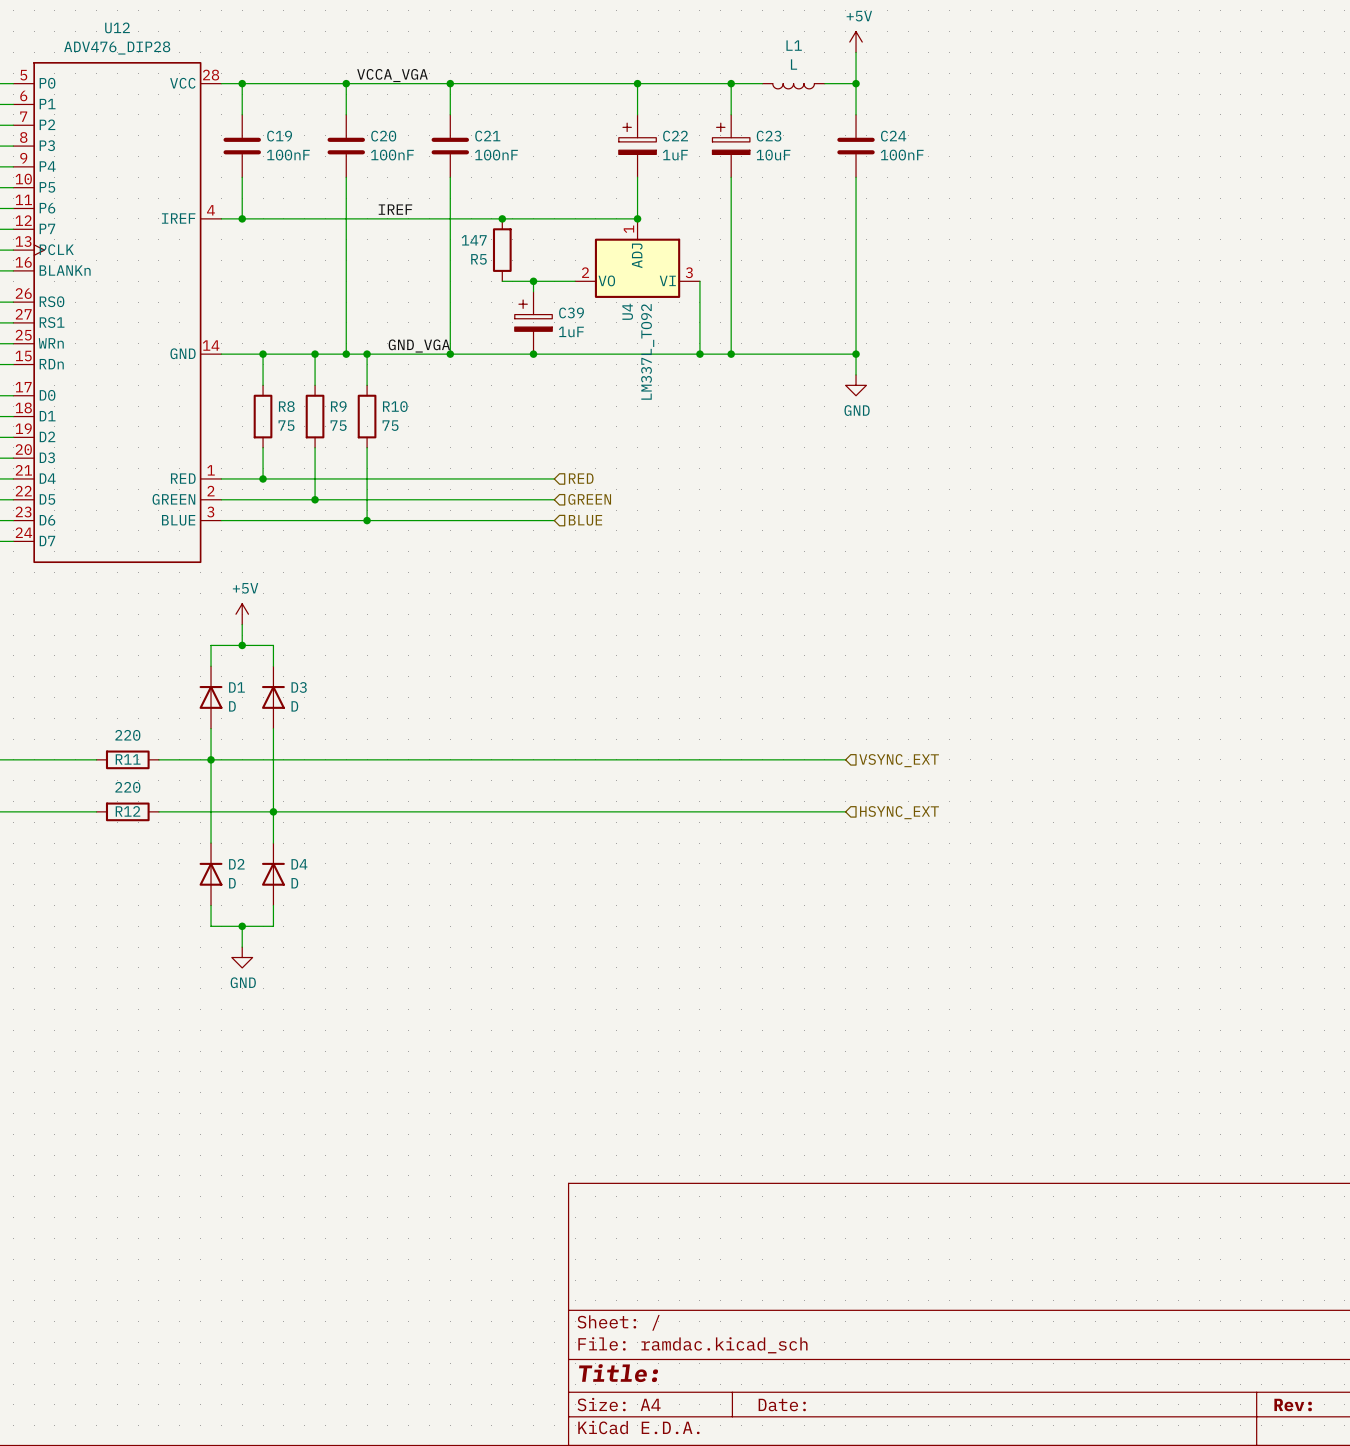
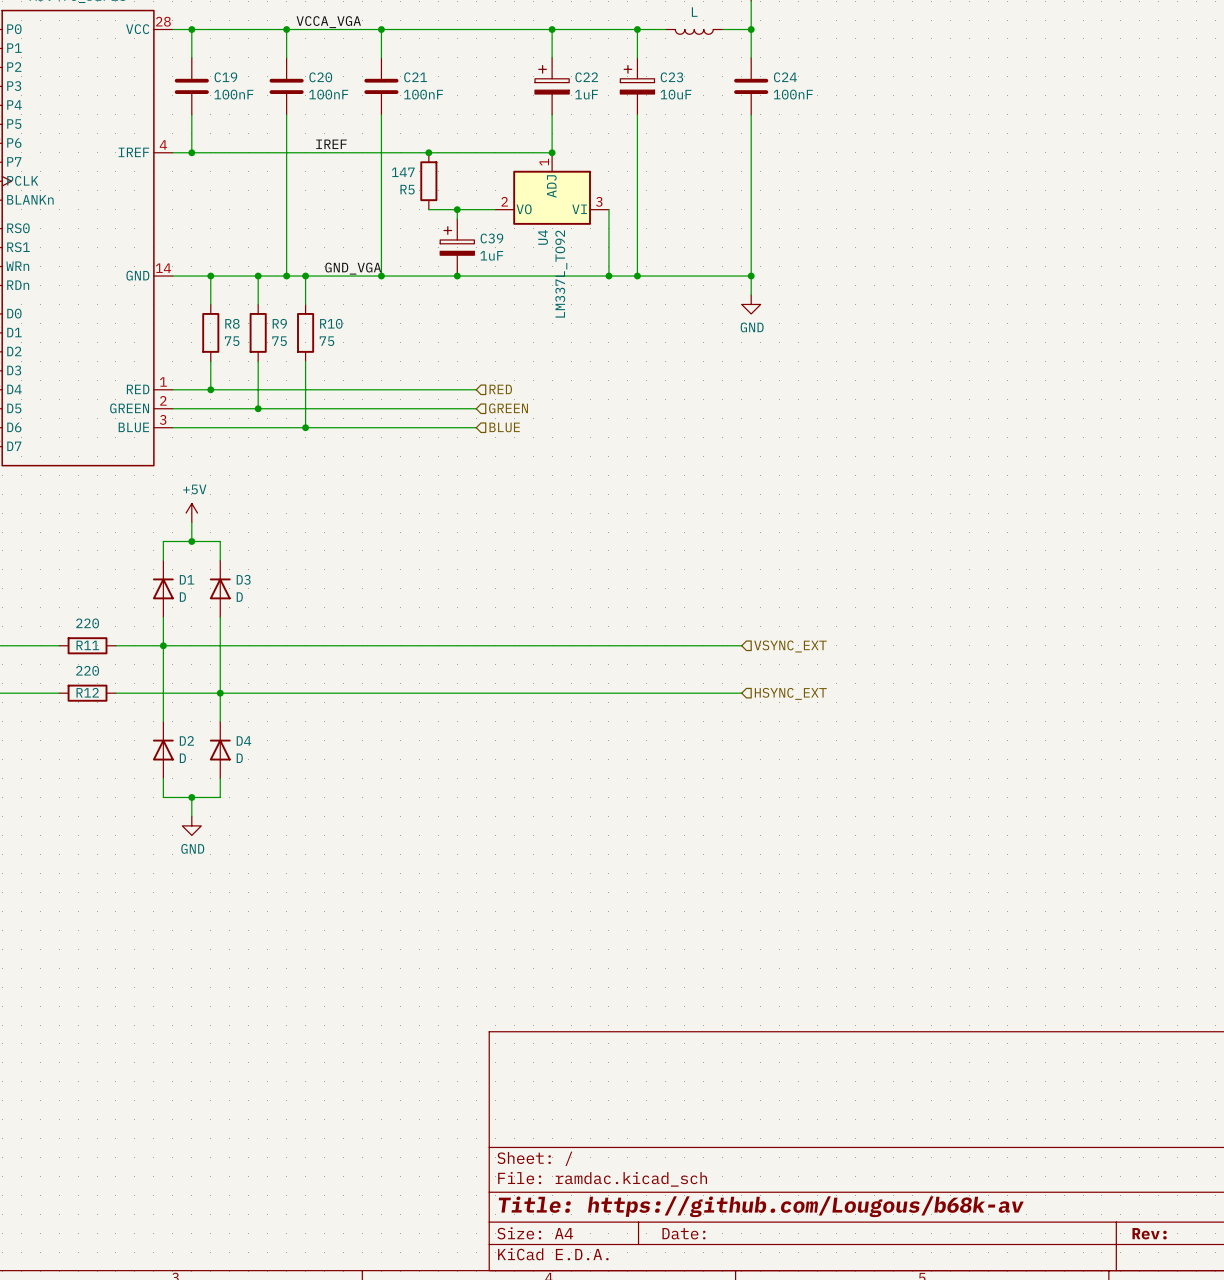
title block: Title: (618, 1373) -> Title: https://github.com/Lougous/b68k-av (761, 1206)

